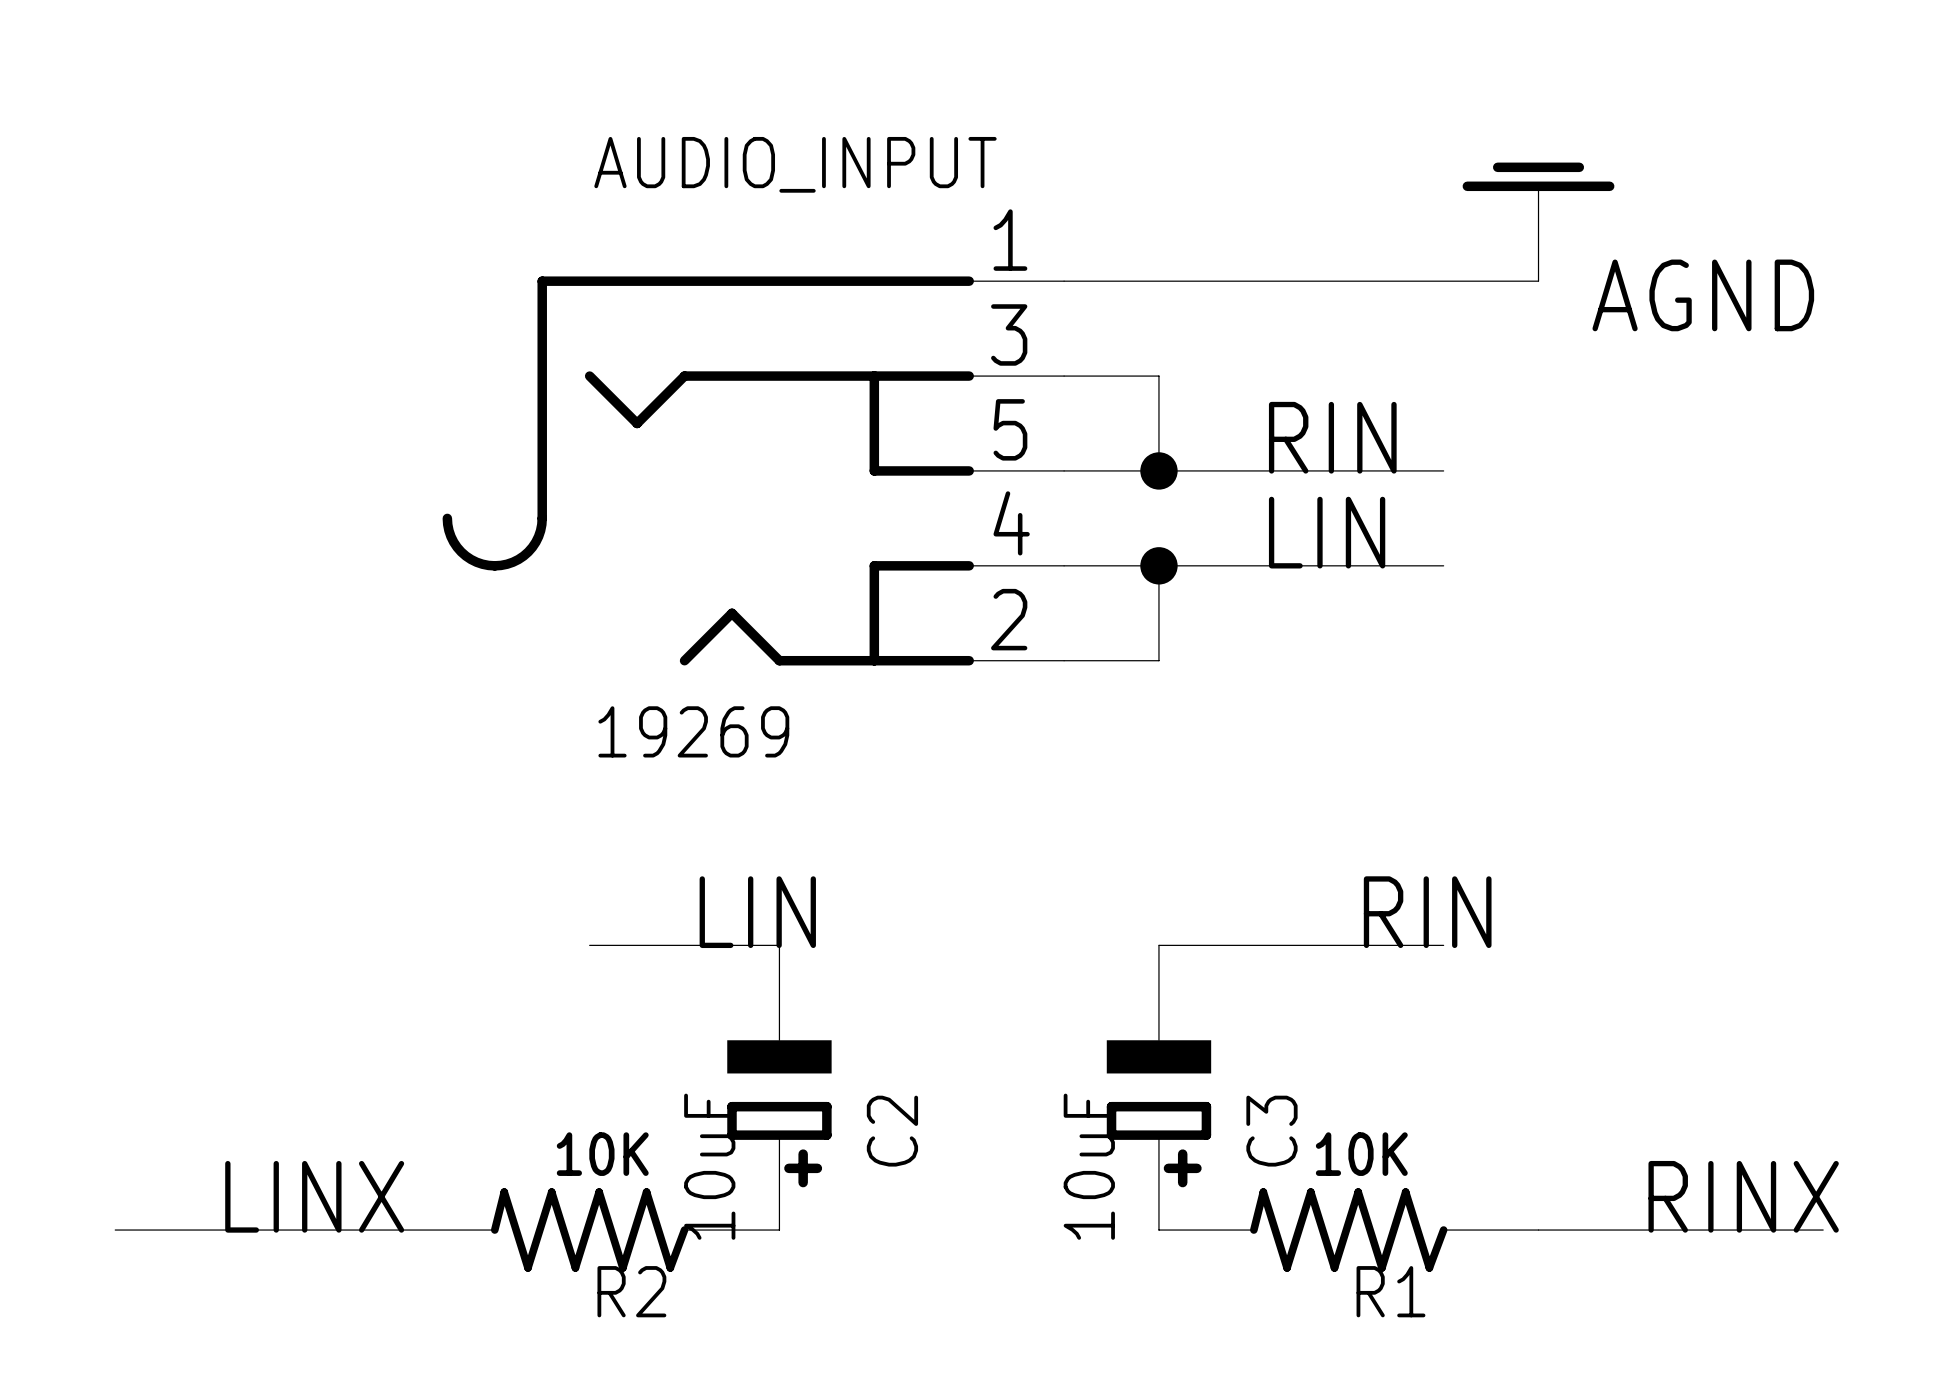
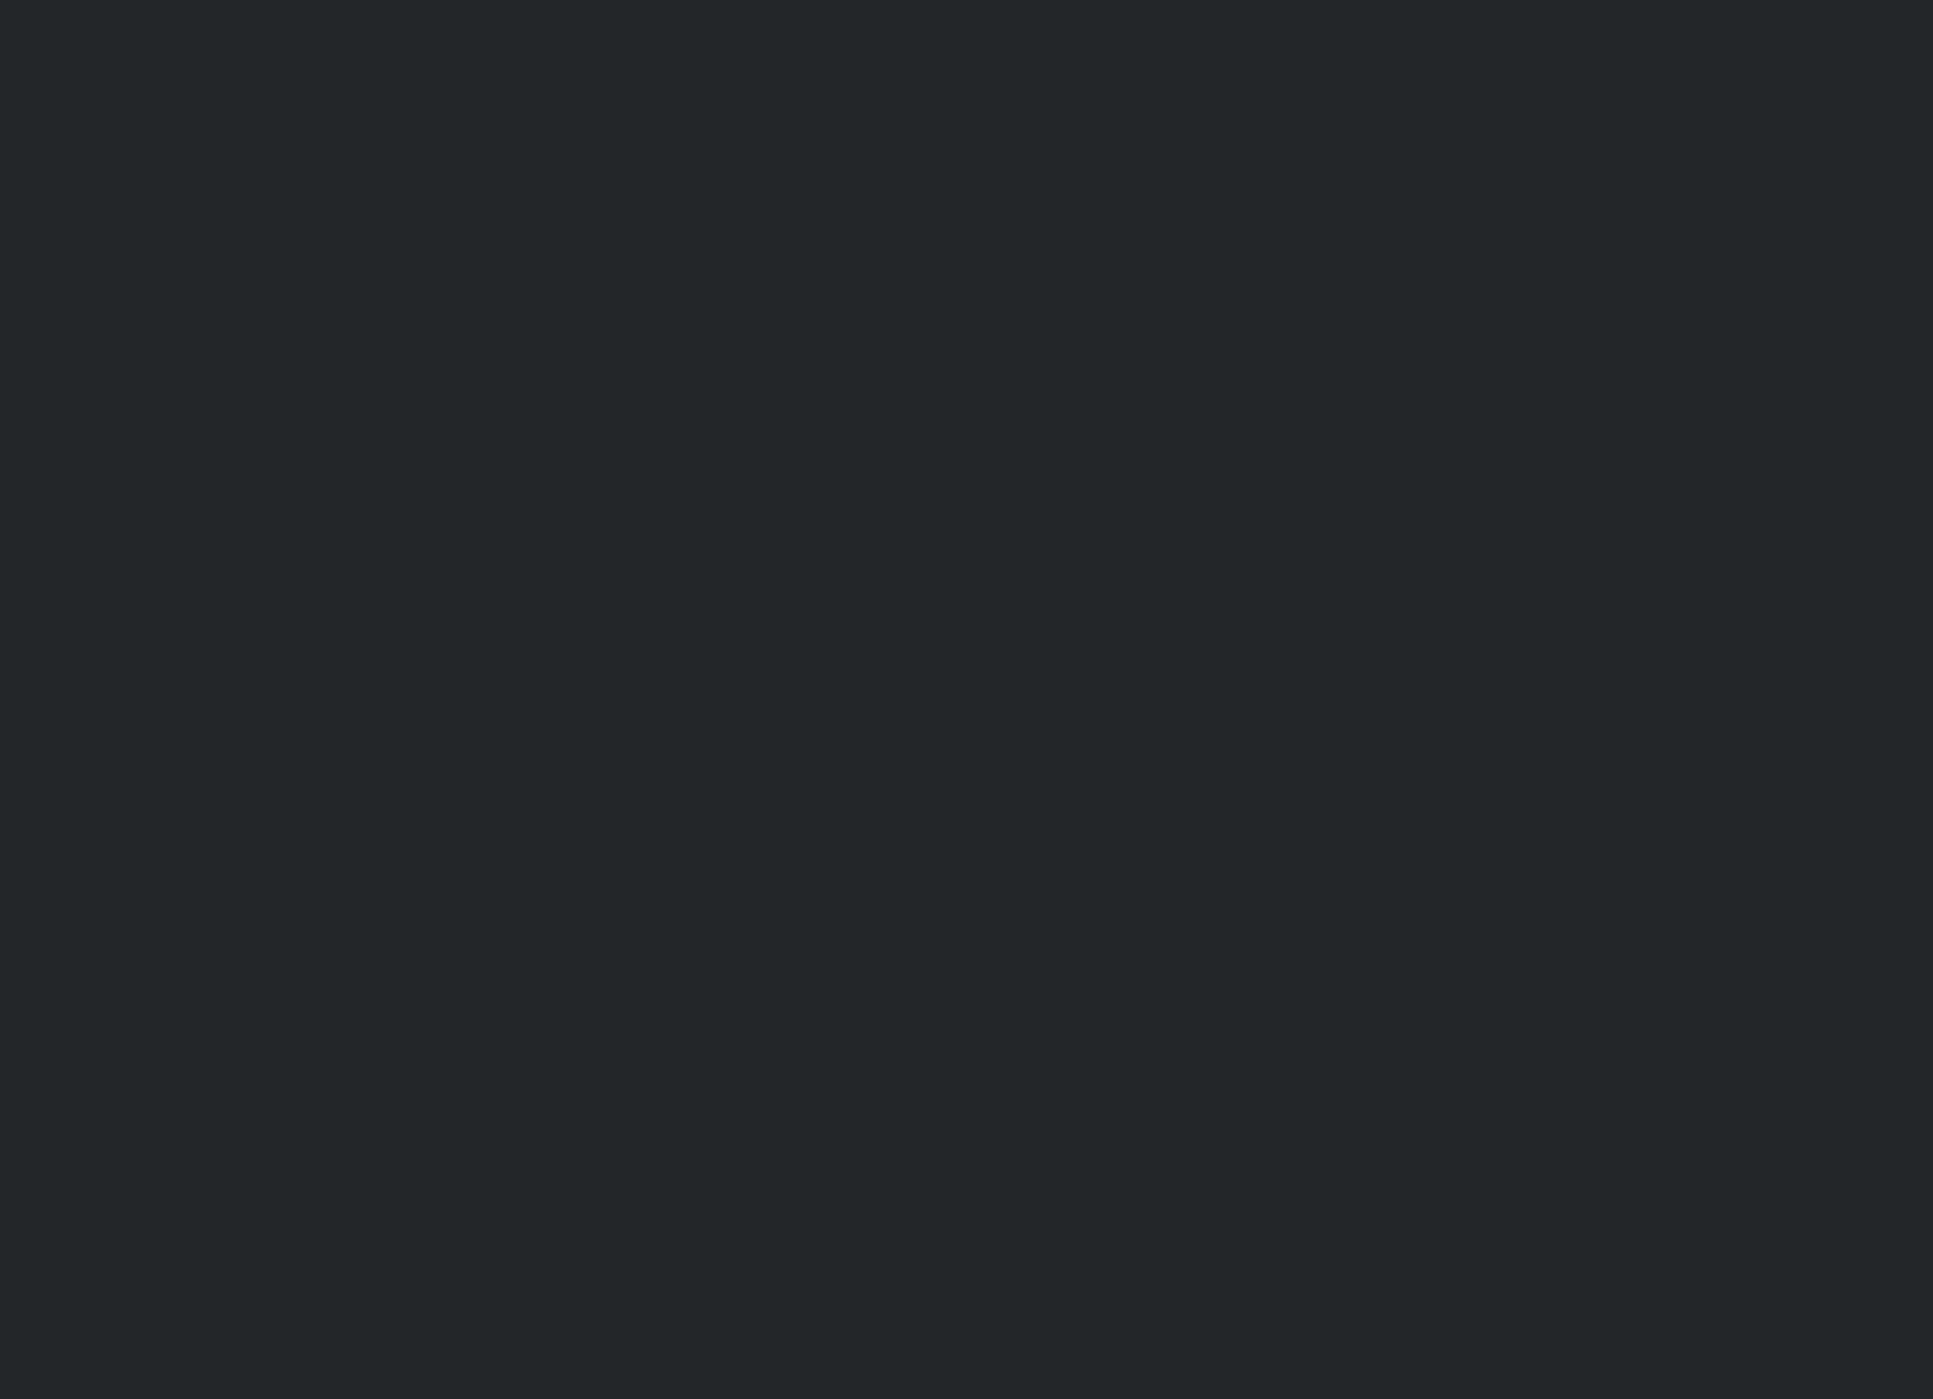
power symbol: AGND (1538, 221) -> none
wire: (1064, 281) (1538, 281) -> none
wire: (1064, 376) (1158, 376) (1158, 470) -> none
label: RIN (1332, 437) -> none
AUDIO_INPUT: 19269 (753, 470) -> none
wire: (1064, 470) (1443, 470) -> none
junction: (1158, 470) -> none
label: LIN (1327, 532) -> none
wire: (1064, 565) (1443, 565) -> none
wire: (1158, 565) (1158, 660) (1064, 660) -> none
junction: (1158, 565) -> none
label: LIN (757, 912) -> none
label: RIN (1427, 912) -> none
wire: (589, 945) (779, 945) -> none
wire: (1158, 945) (1443, 945) -> none
C2: 10uF (779, 1087) -> none
C3: 10uF (1158, 1087) -> none
label: LINX (314, 1196) -> none
label: RINX (1743, 1196) -> none
wire: (115, 1230) (399, 1230) -> none
R2: 10K (589, 1230) -> none
R1: 10K (1348, 1230) -> none
wire: (1538, 1230) (1823, 1230) -> none

